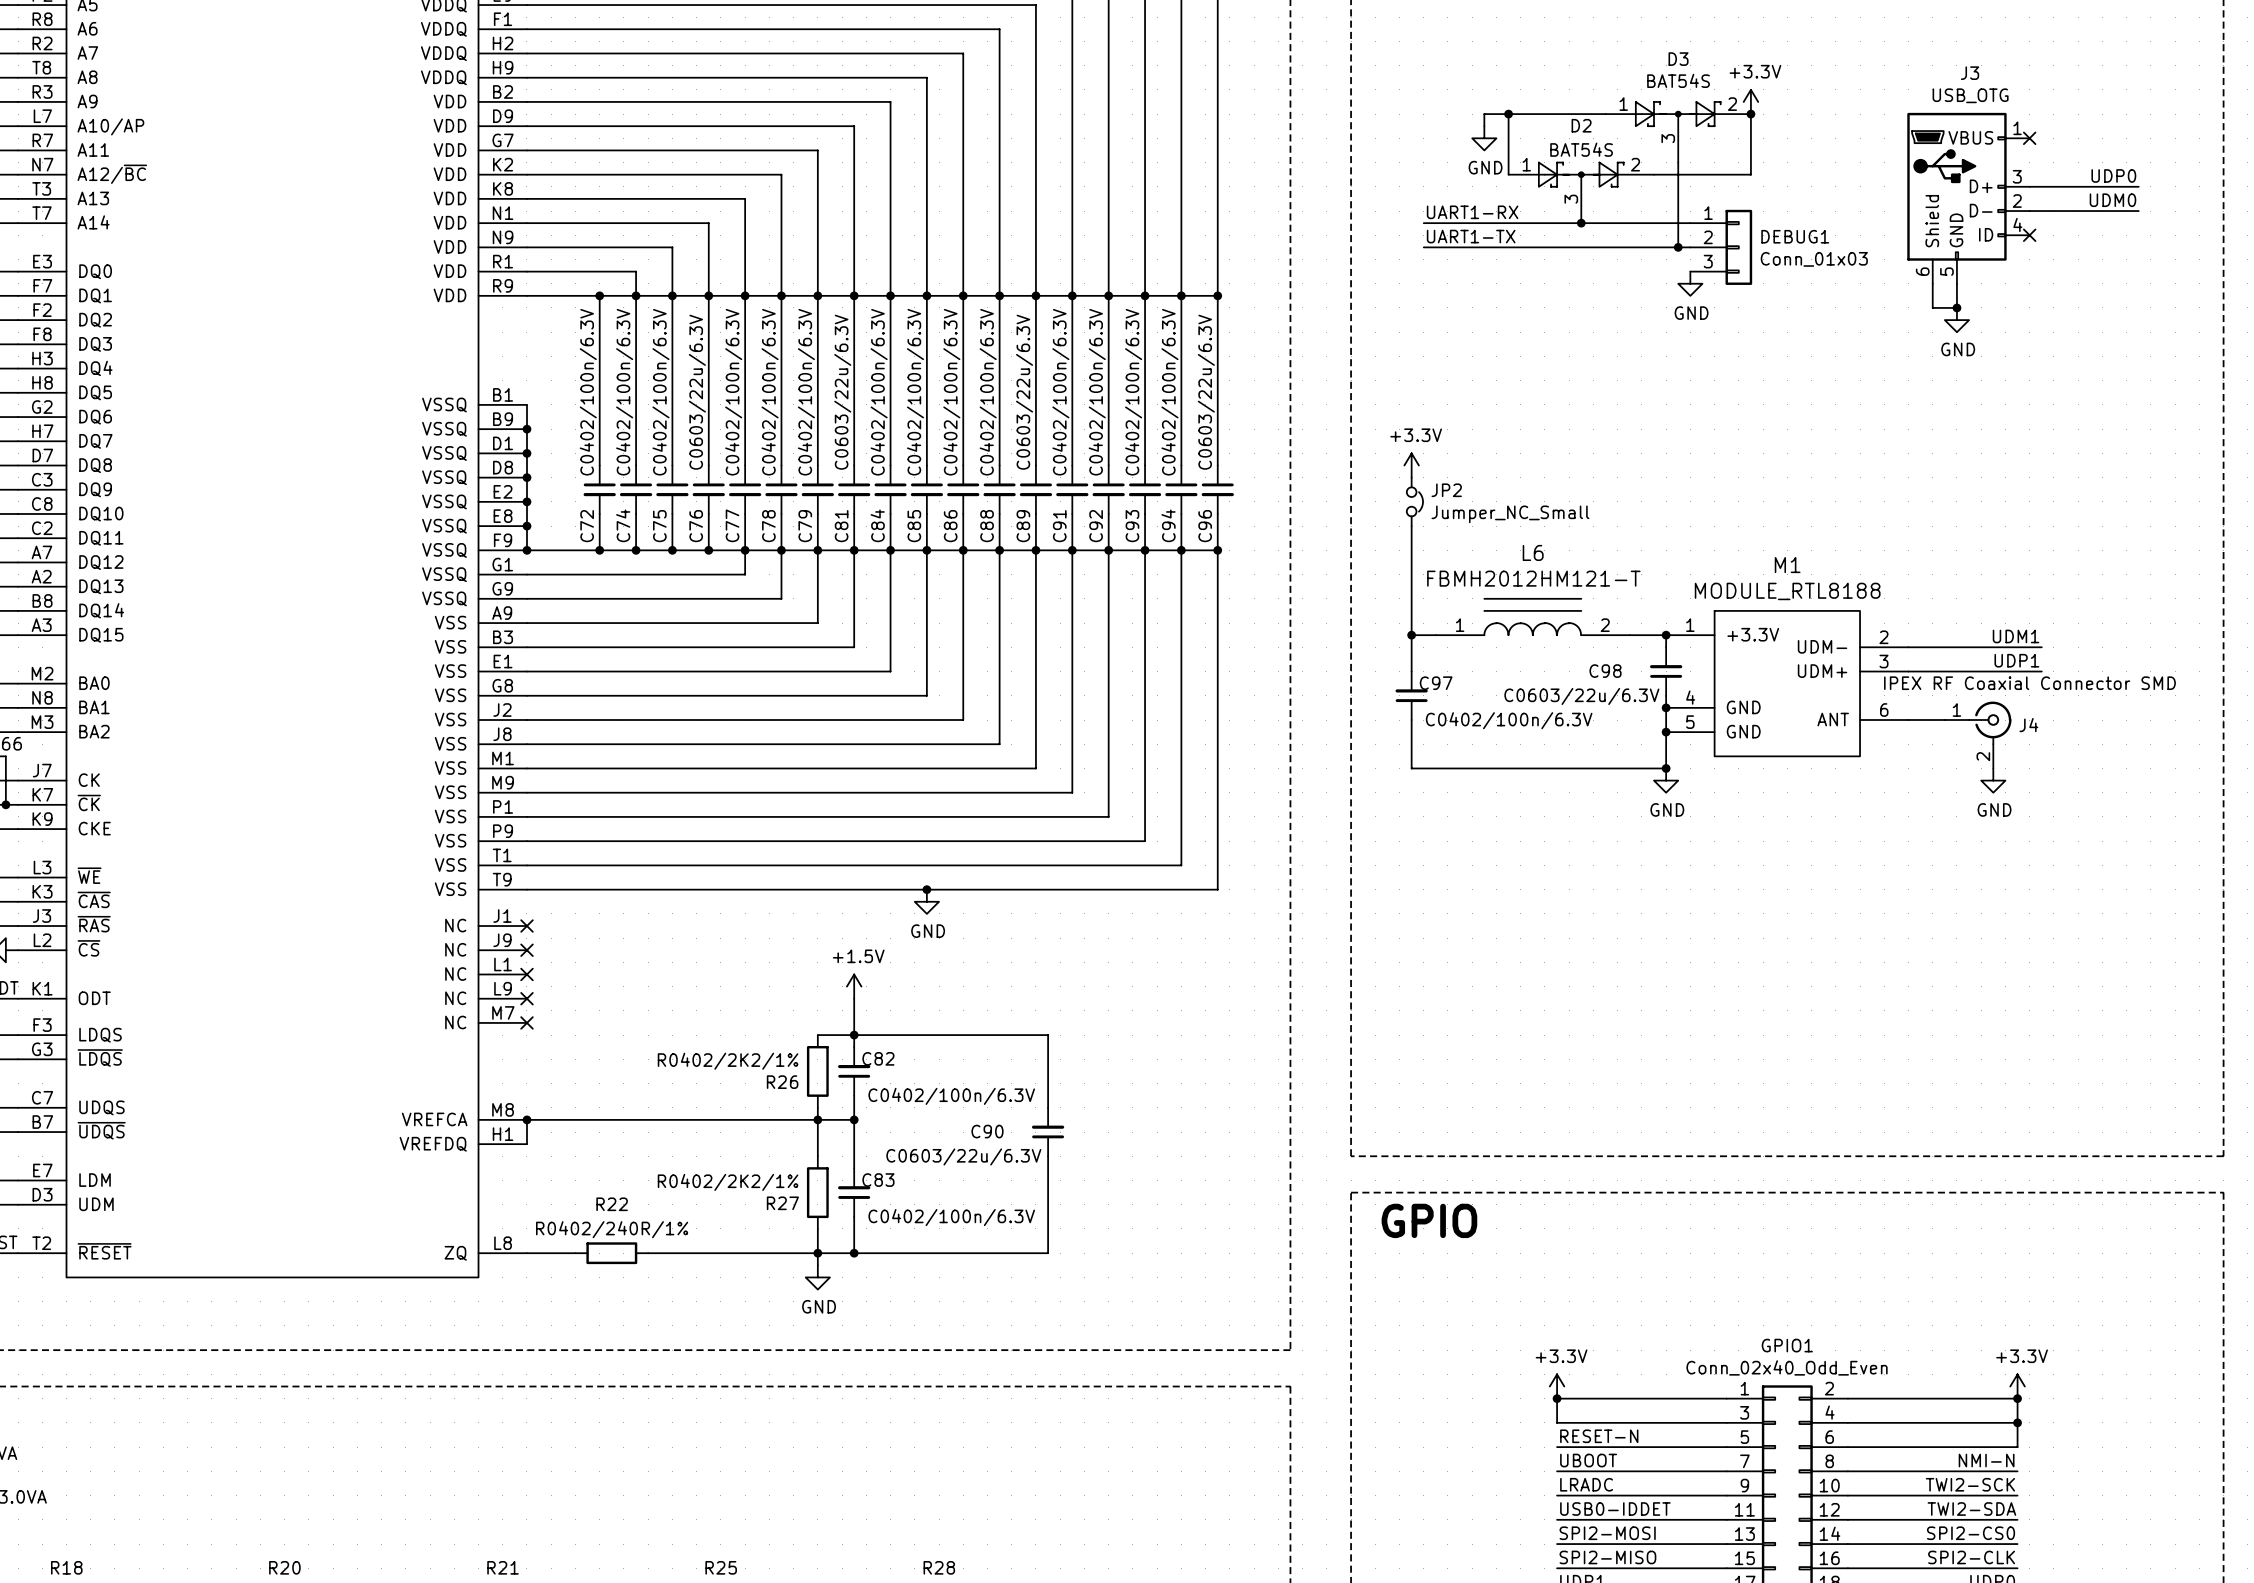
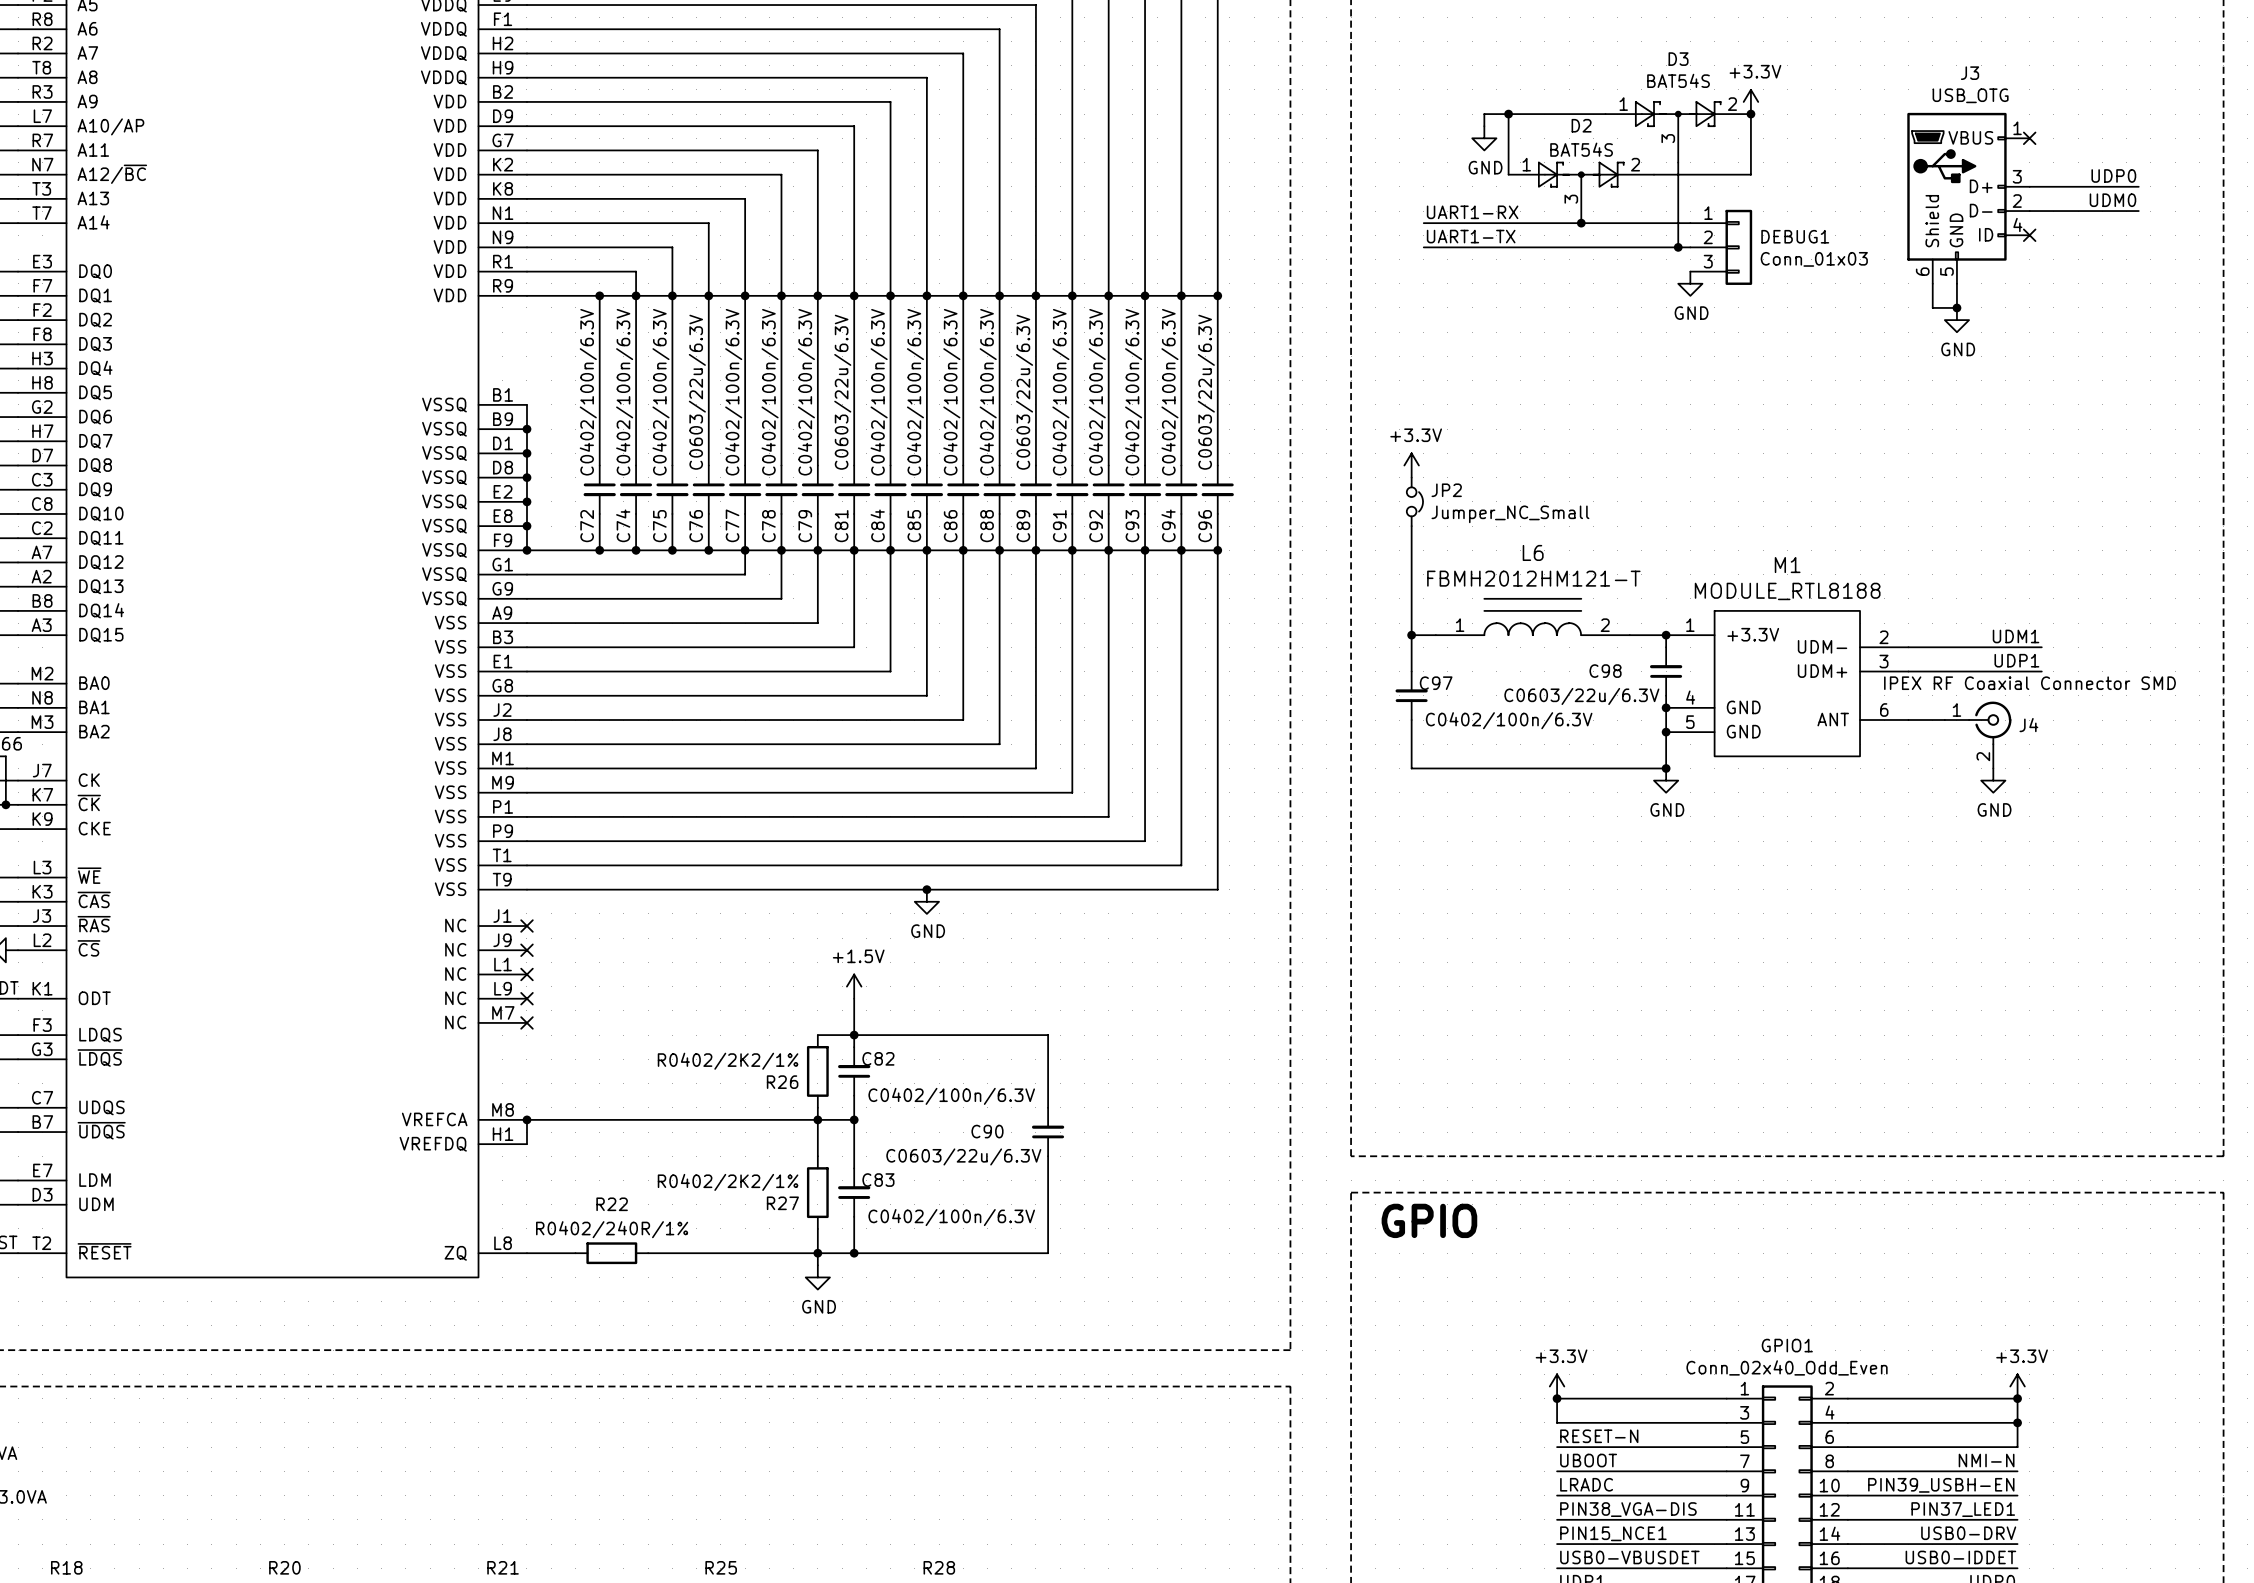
label: TWI2-SCK (1970, 1484) -> PIN39_USBH-EN (1941, 1485)
label: USB0-IDDET (1615, 1509) -> PIN38_VGA-DIS (1628, 1509)
label: TWI2-SDA (1971, 1509) -> PIN37_LED1 (1963, 1509)
label: SPI2-MOSI (1607, 1533) -> PIN15_NCE1 (1613, 1533)
label: SPI2-CS0 (1971, 1533) -> USB0-DRV (1968, 1533)
label: SPI2-MISO (1607, 1557) -> USB0-VBUSDET (1629, 1557)
label: SPI2-CLK (1971, 1557) -> USB0-IDDET (1960, 1557)

